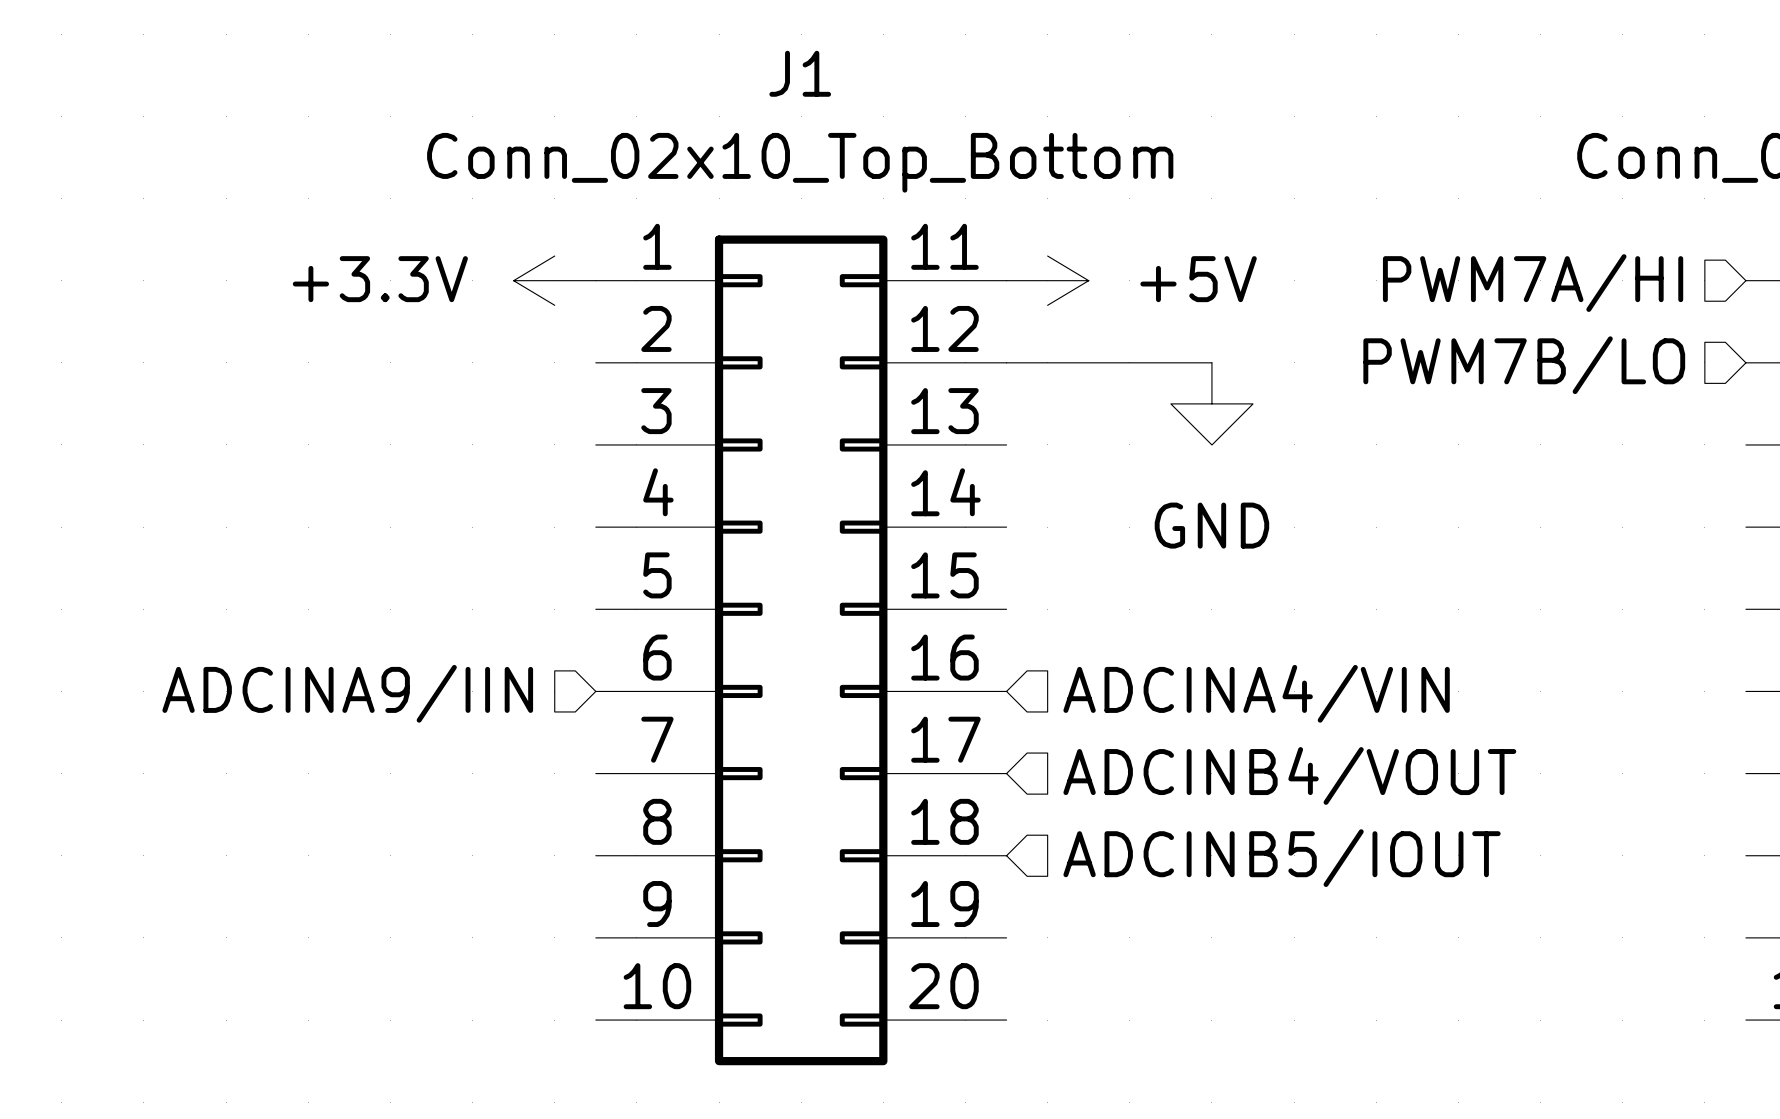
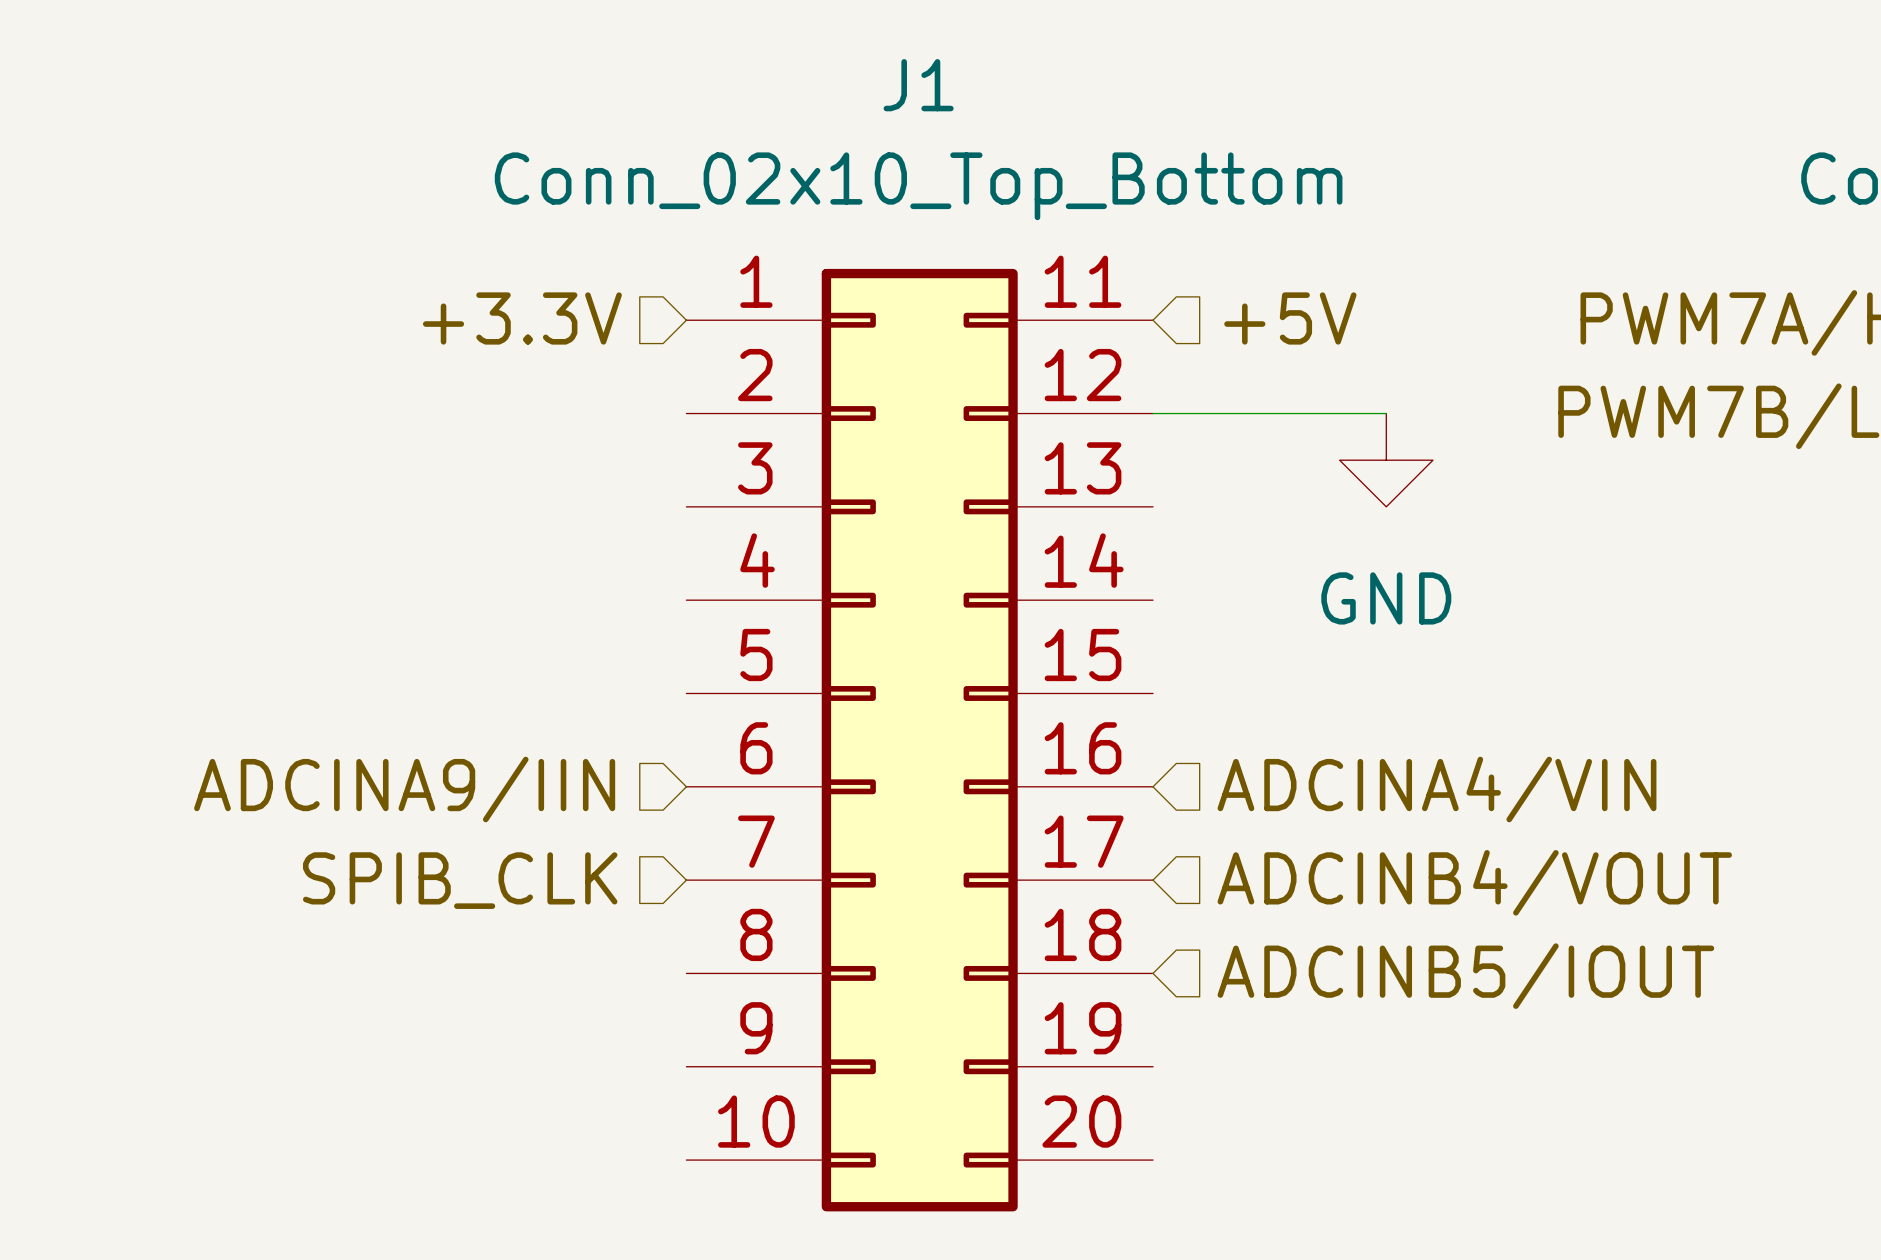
hierarchical label: none -> +3.3V (522, 318)
hierarchical label: none -> +5V (1290, 318)
power symbol: +3.3V (554, 280) -> none
power symbol: +5V (1047, 280) -> none
hierarchical label: none -> SPIB_CLK (460, 880)

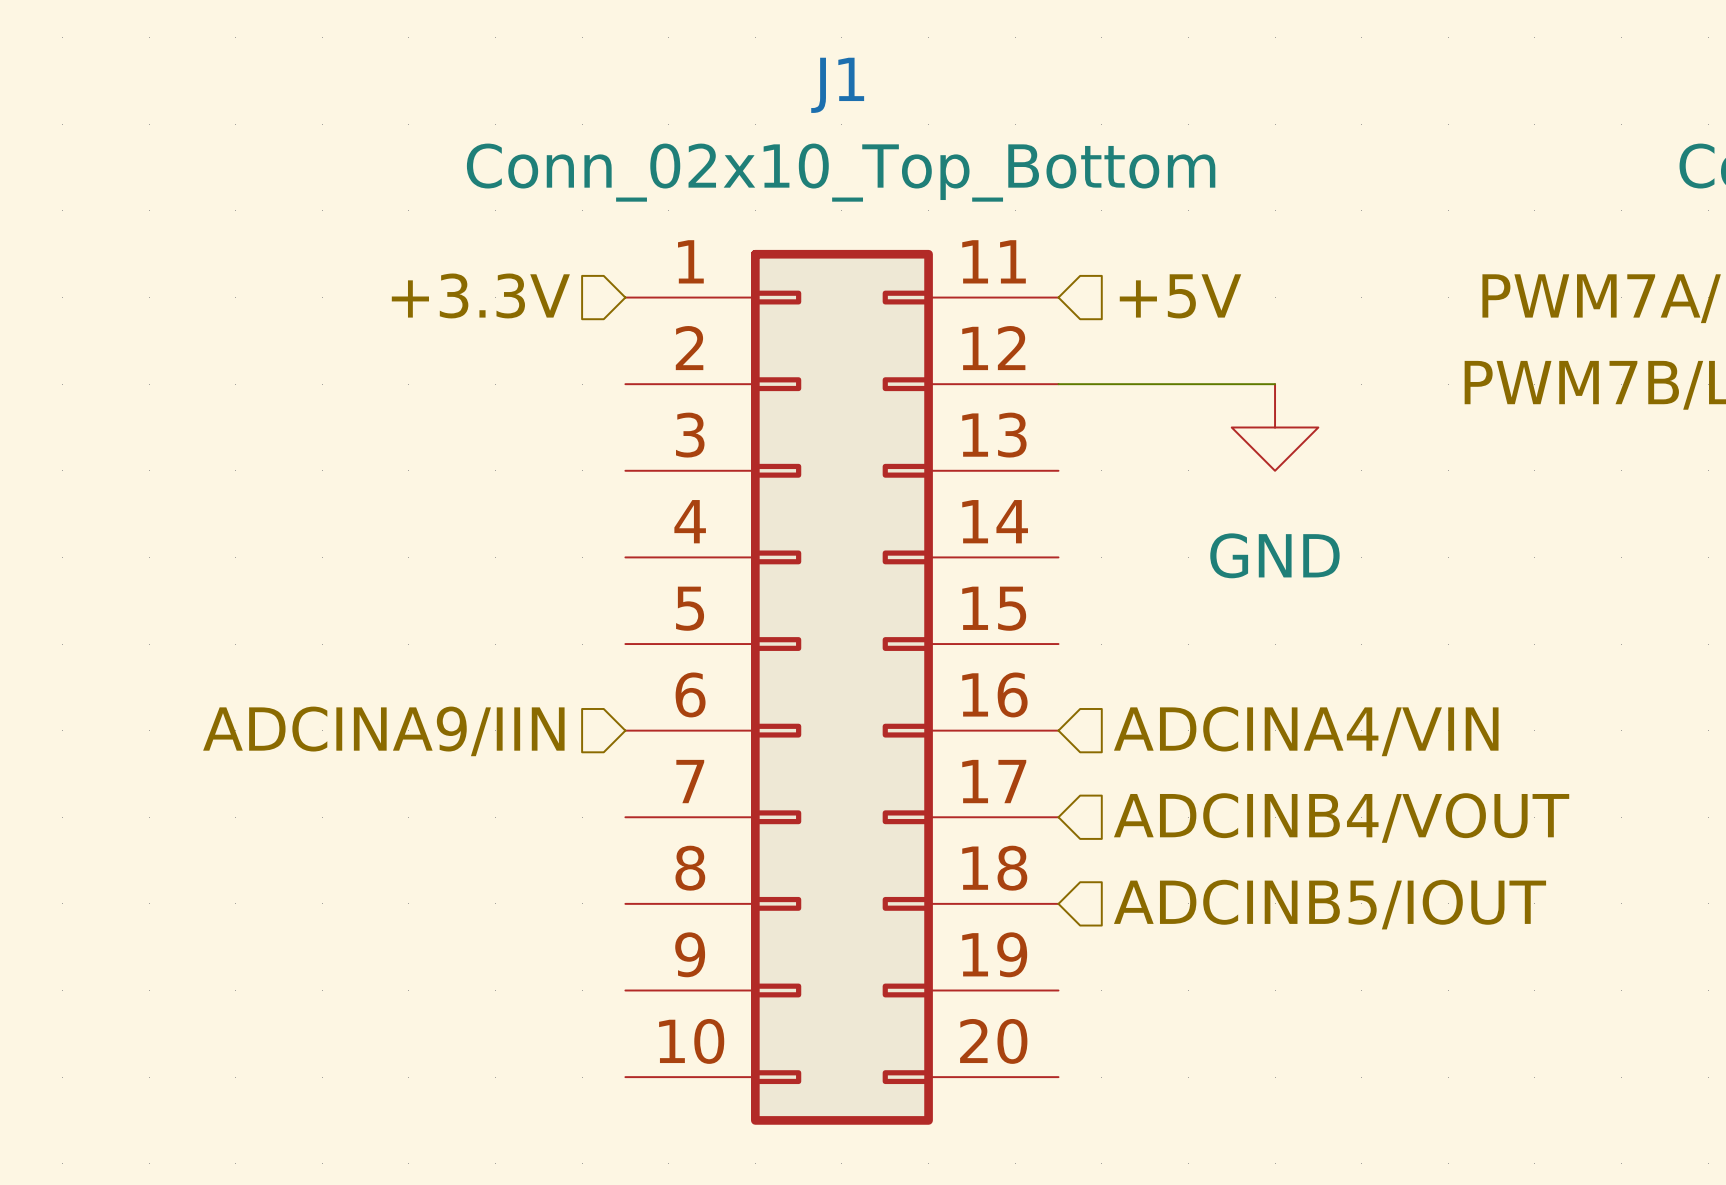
hierarchical label: SPIB_CLK (460, 880) -> none

